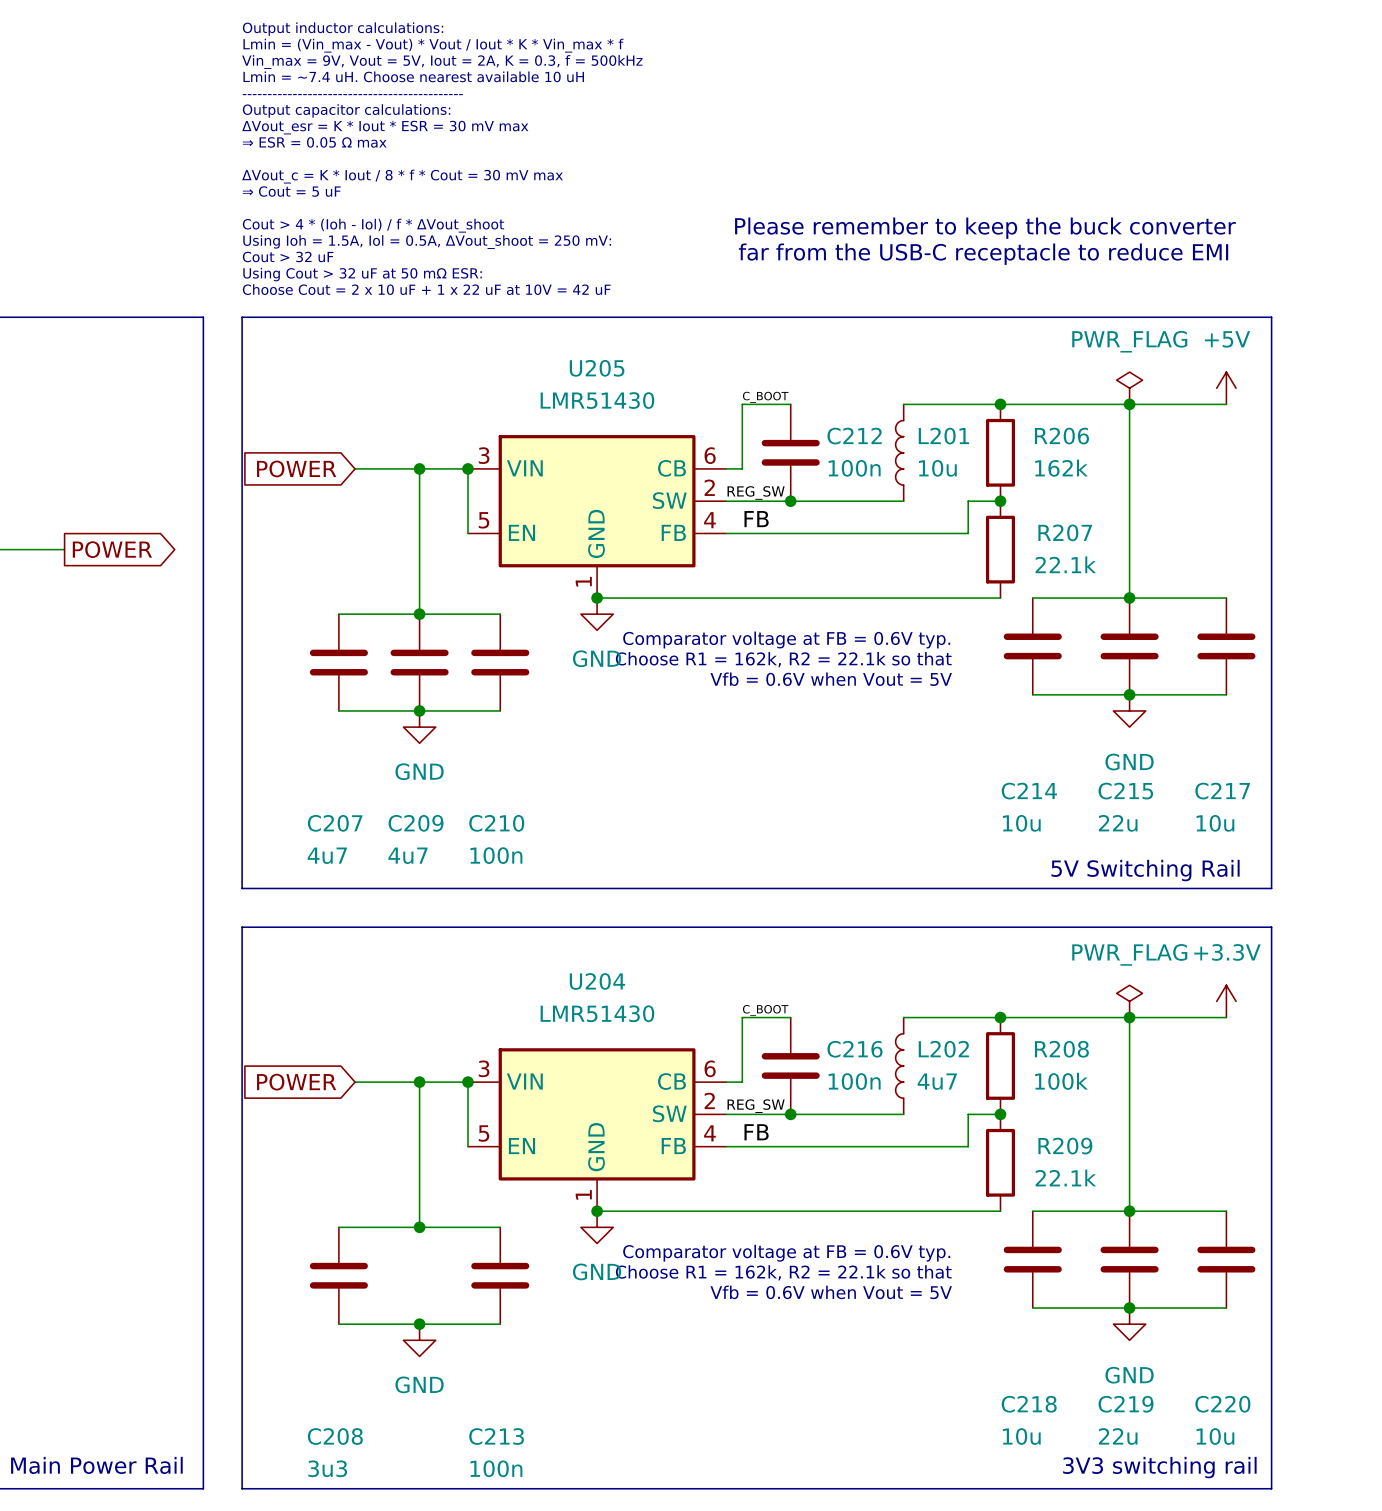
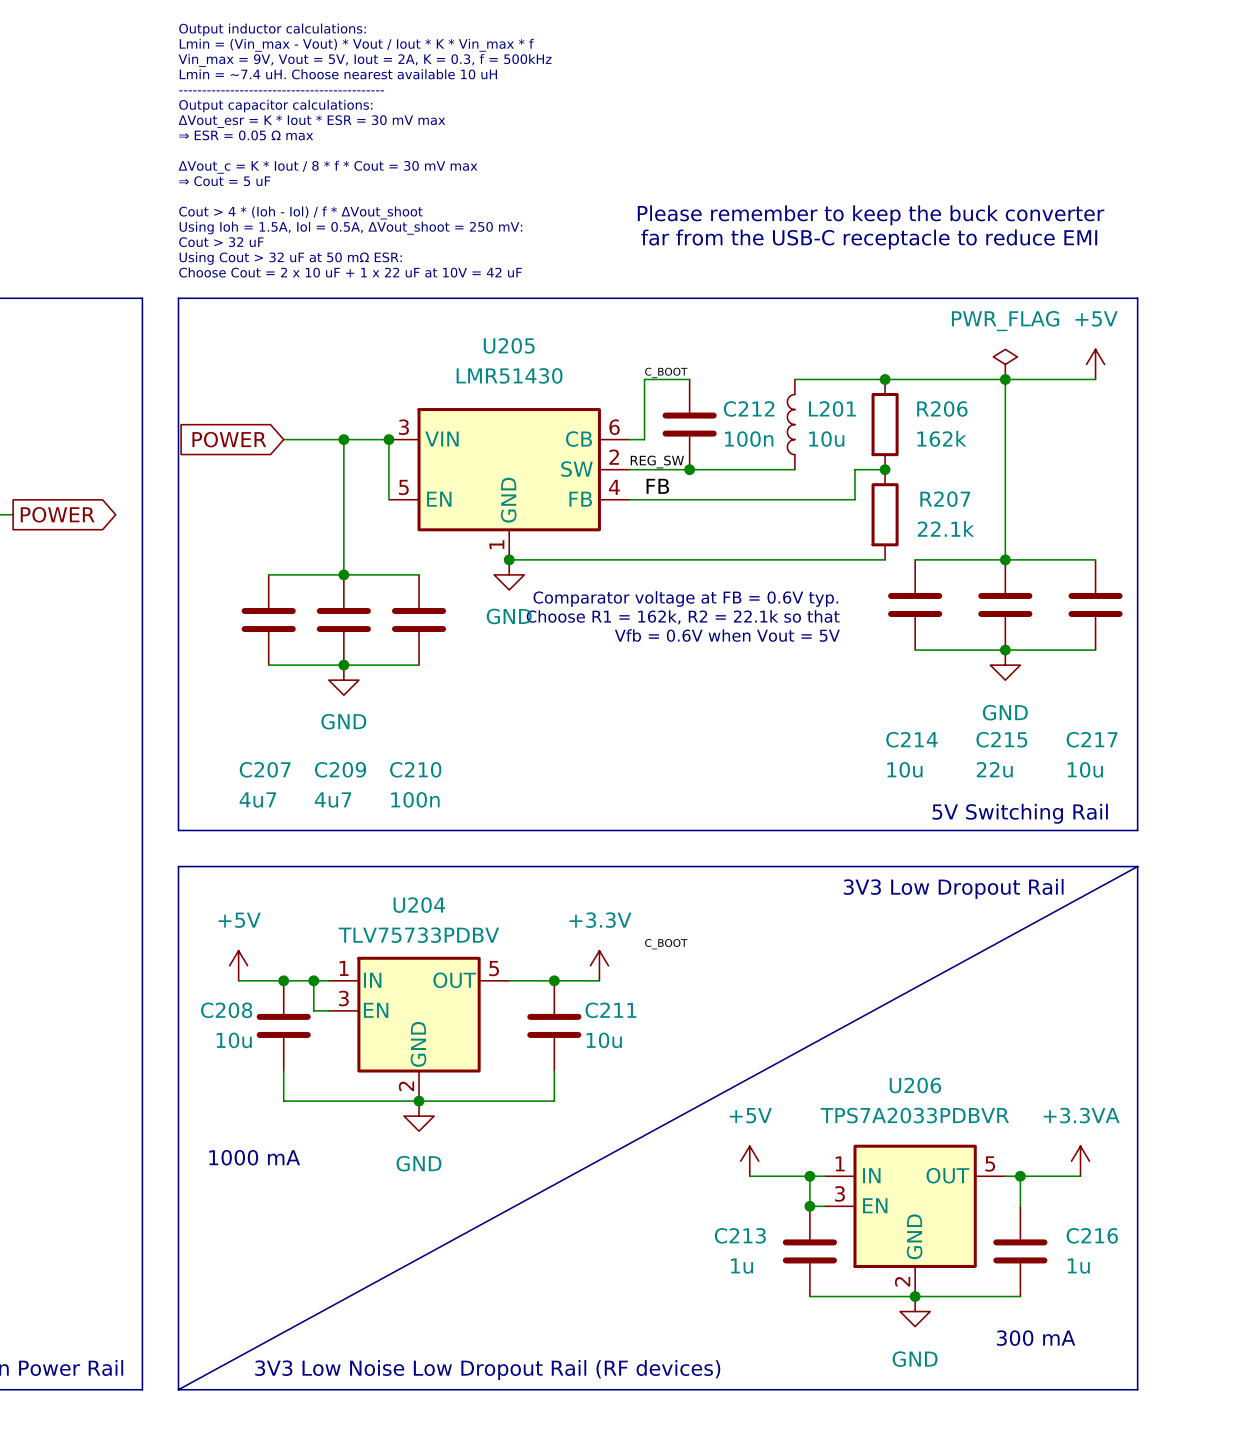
line: none -> (1137, 866) (178, 1389)
text: none -> 3V3 Low Dropout Rail (953, 888)
power symbol: PWR_FLAG (1129, 1001) -> none
power symbol: +3.3V (1226, 1001) -> none
U204 value: LMR51430 (597, 1013) -> TLV75733PDBV (418, 935)
wire: (790, 1017) (742, 1017) (742, 1082) (726, 1082) -> none
wire: (903, 1017) (1226, 1017) -> none
junction: (1000, 1017) -> none
wire: (1129, 1017) (1129, 1211) -> none
junction: (1129, 1017) -> none
power symbol: none -> +5V (238, 965)
power symbol: none -> +3.3V (599, 965)
U204 symbol: [467, 1048, 727, 1212] -> [328, 956, 510, 1102]
wire: none -> (238, 980) (328, 980)
junction: none -> (283, 980)
junction: none -> (313, 980)
junction: none -> (554, 980)
C216 name position: C216 (854, 1049) -> C216 (1092, 1235)
C216 position: (790, 1065) -> (1020, 1251)
L202: 4u7 (899, 1065) -> none
R208: 100k (1000, 1065) -> none
C216 value: 100n (854, 1081) -> 1u (1078, 1266)
global label: POWER (296, 1082) -> none
wire: (355, 1082) (387, 1082) -> (313, 980) (313, 1010)
wire: (419, 1082) (419, 1227) -> none
junction: (419, 1082) -> none
junction: (467, 1082) -> none
C211: none -> 10u (554, 1025)
label: REG_SW (756, 1106) -> none
wire: (726, 1114) (903, 1114) -> none
junction: (790, 1114) -> none
wire: (1000, 1114) (968, 1114) (968, 1146) (726, 1146) -> none
junction: (1000, 1114) -> none
label: FB (756, 1132) -> none
wire: none -> (283, 1071) (283, 1101) (554, 1101) (554, 1071)
R209: 22.1k (1000, 1162) -> none
junction: none -> (419, 1101)
power symbol: none -> GND (419, 1116)
wire: (597, 1211) (1000, 1211) -> none
junction: (597, 1211) -> none
wire: (1032, 1211) (1226, 1211) -> none
junction: (1129, 1211) -> none
wire: (338, 1227) (500, 1227) -> none
junction: (419, 1227) -> none
power symbol: GND (597, 1227) -> none
text: none -> 1000 mA (254, 1157)
power symbol: none -> +5V (749, 1161)
power symbol: none -> +3.3VA (1080, 1161)
text: Comparator voltage at FB = 0.6V typ. (786, 1253) -> none
wire: none -> (749, 1176) (824, 1176)
wire: none -> (809, 1176) (809, 1206) (824, 1206)
junction: none -> (809, 1176)
C218: 10u (1032, 1259) -> none
wire: none -> (1005, 1176) (1080, 1176)
C219: 22u (1129, 1259) -> none
wire: none -> (1020, 1176) (1020, 1206)
junction: none -> (1020, 1176)
C220: 10u (1226, 1259) -> none
text: Choose R1 = 162k, R2 = 22.1k so that (783, 1272) -> none
C208 position: (338, 1275) -> (283, 1025)
C213 position: (500, 1275) -> (809, 1251)
junction: none -> (809, 1206)
text: Vfb = 0.6V when Vout = 5V (831, 1292) -> none
U206: none -> TPS7A2033PDBVR (915, 1220)
wire: (1032, 1308) (1226, 1308) -> none
junction: (1129, 1308) -> none
wire: (338, 1324) (500, 1324) -> none
junction: (419, 1324) -> none
power symbol position: GND (1129, 1324) -> GND (915, 1311)
power symbol: GND (419, 1340) -> none
wire: none -> (809, 1296) (1020, 1296)
junction: none -> (915, 1296)
text: none -> 300 mA (1036, 1338)
C208 name position: C208 (335, 1436) -> C208 (226, 1010)
C213 name position: C213 (496, 1436) -> C213 (740, 1235)
text: none -> 3V3 Low Noise Low Dropout Rail (RF devices) (487, 1370)
text: 3V3 switching rail (1159, 1467) -> none
C208 value: 3u3 (327, 1468) -> 10u (234, 1040)
C213 value: 100n (496, 1468) -> 1u (742, 1266)

